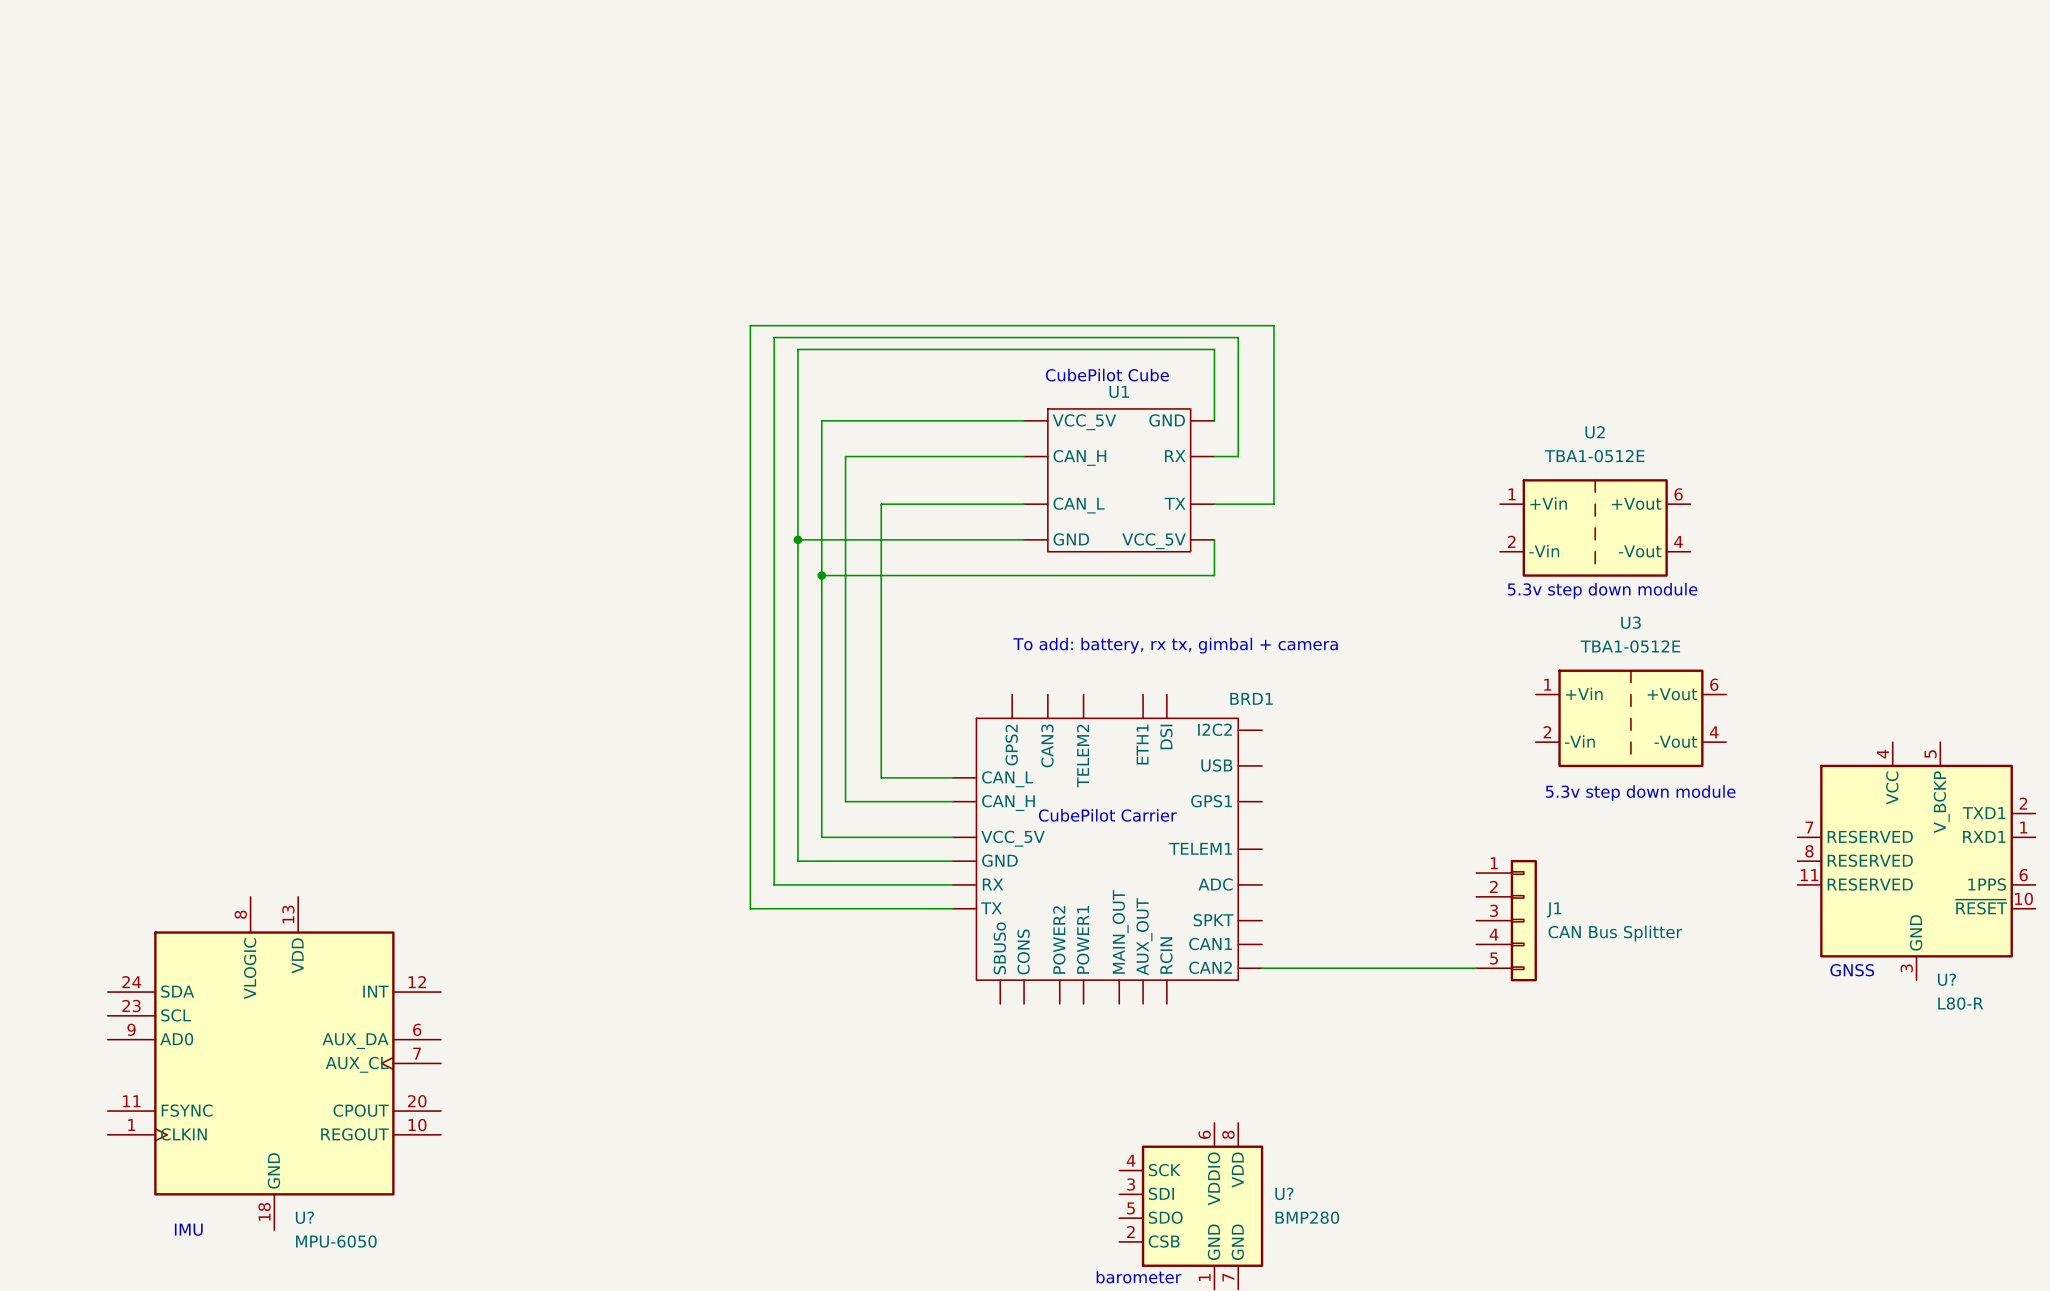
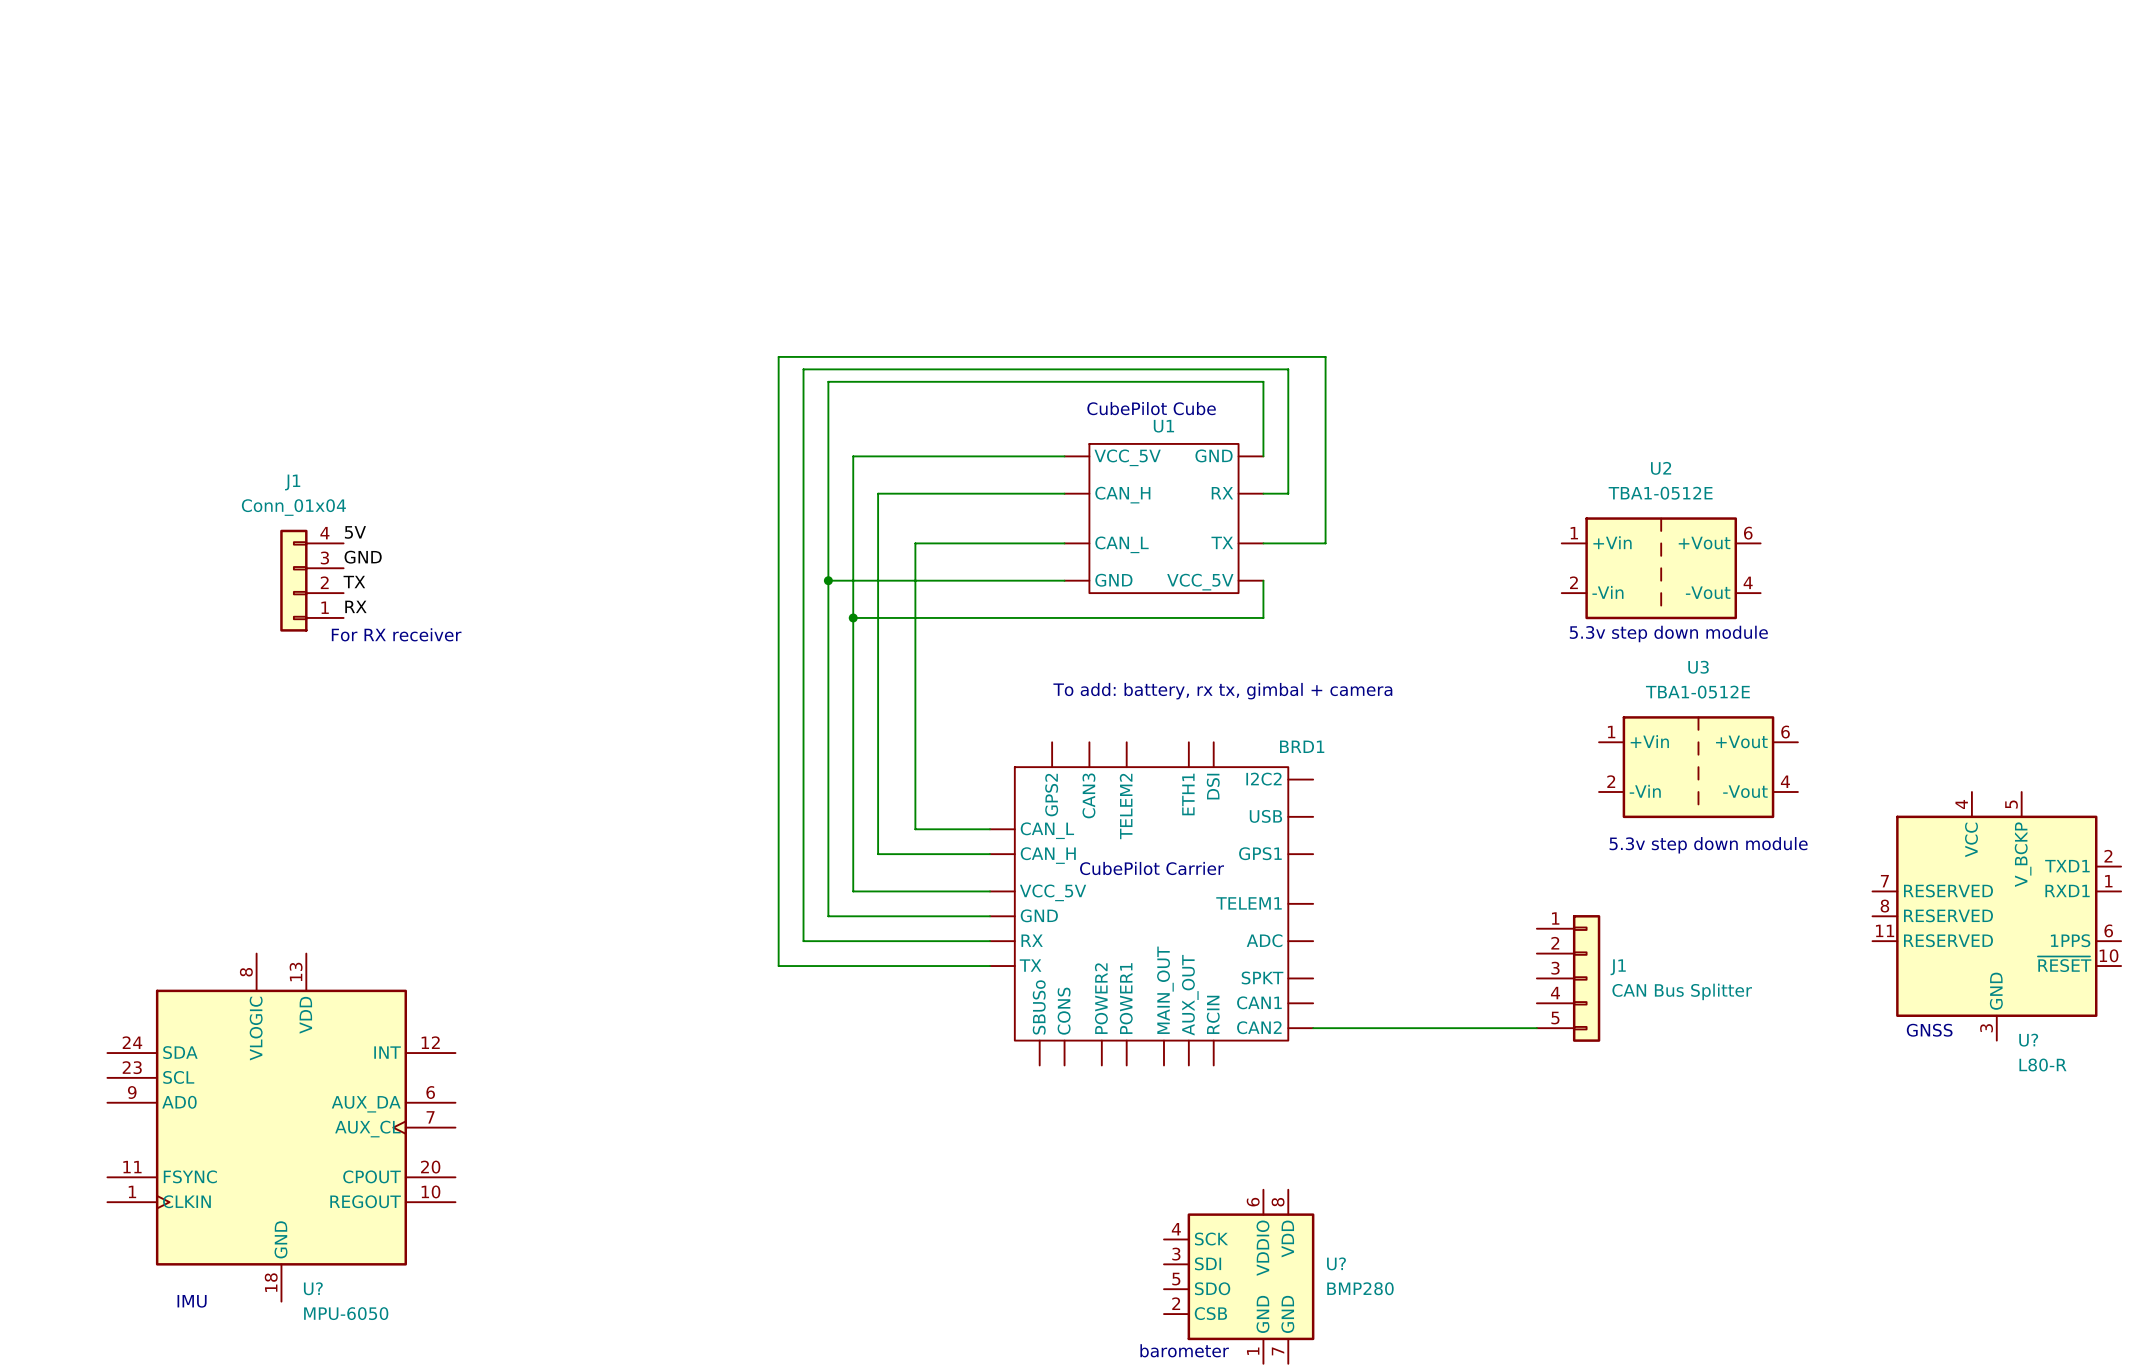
label: none -> 5V (355, 532)
label: none -> GND (363, 557)
J1: none -> Conn_01x04 (311, 580)
label: none -> TX (354, 582)
label: none -> RX (355, 606)
text: none -> For RX receiver (396, 634)

